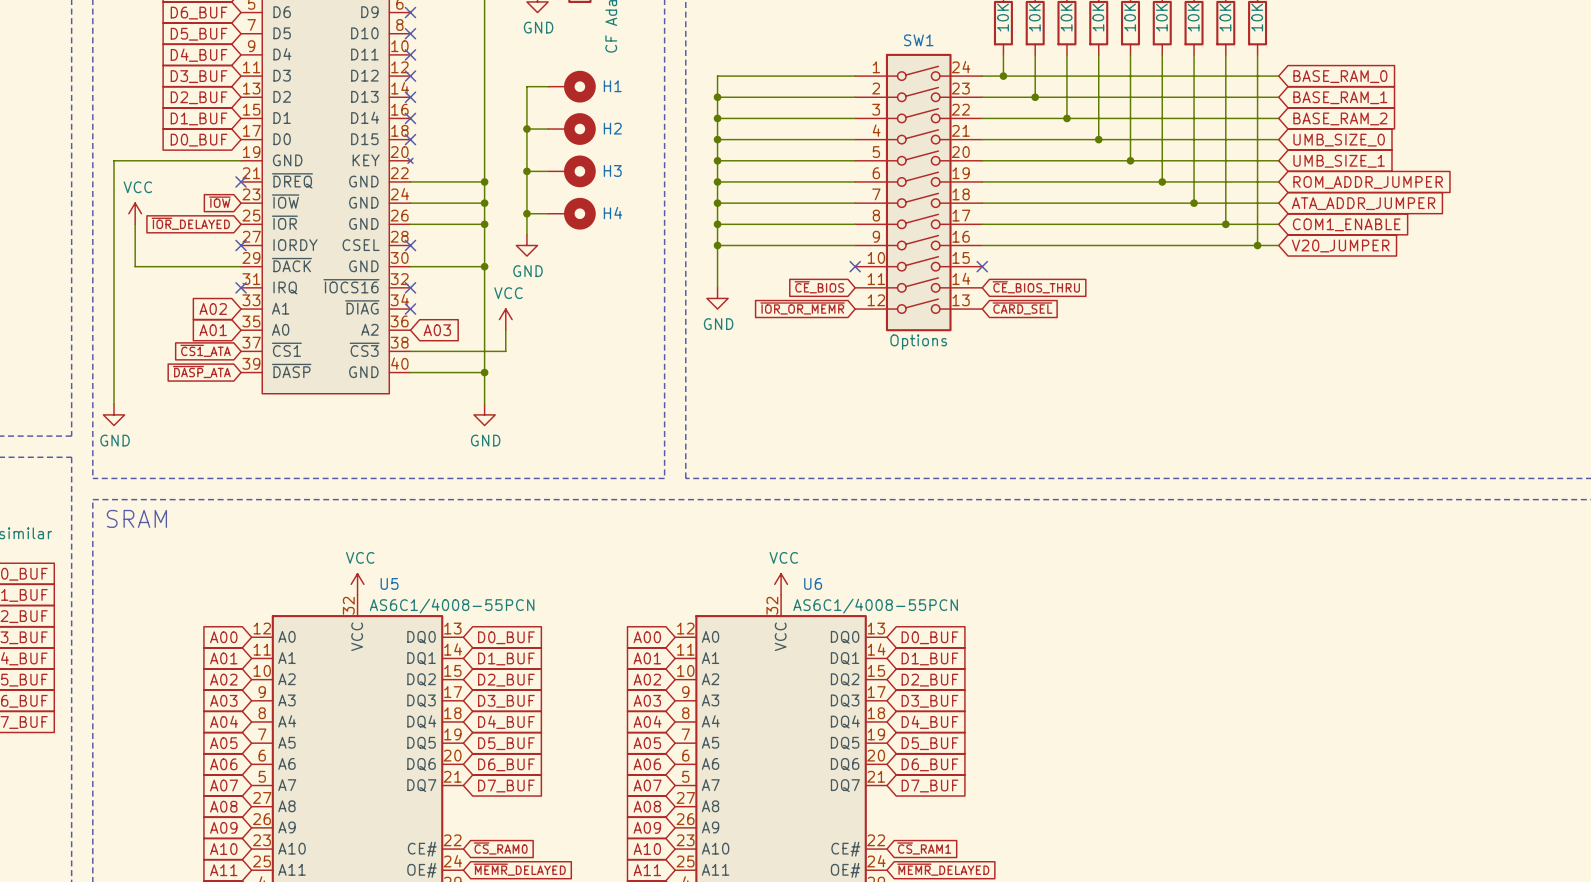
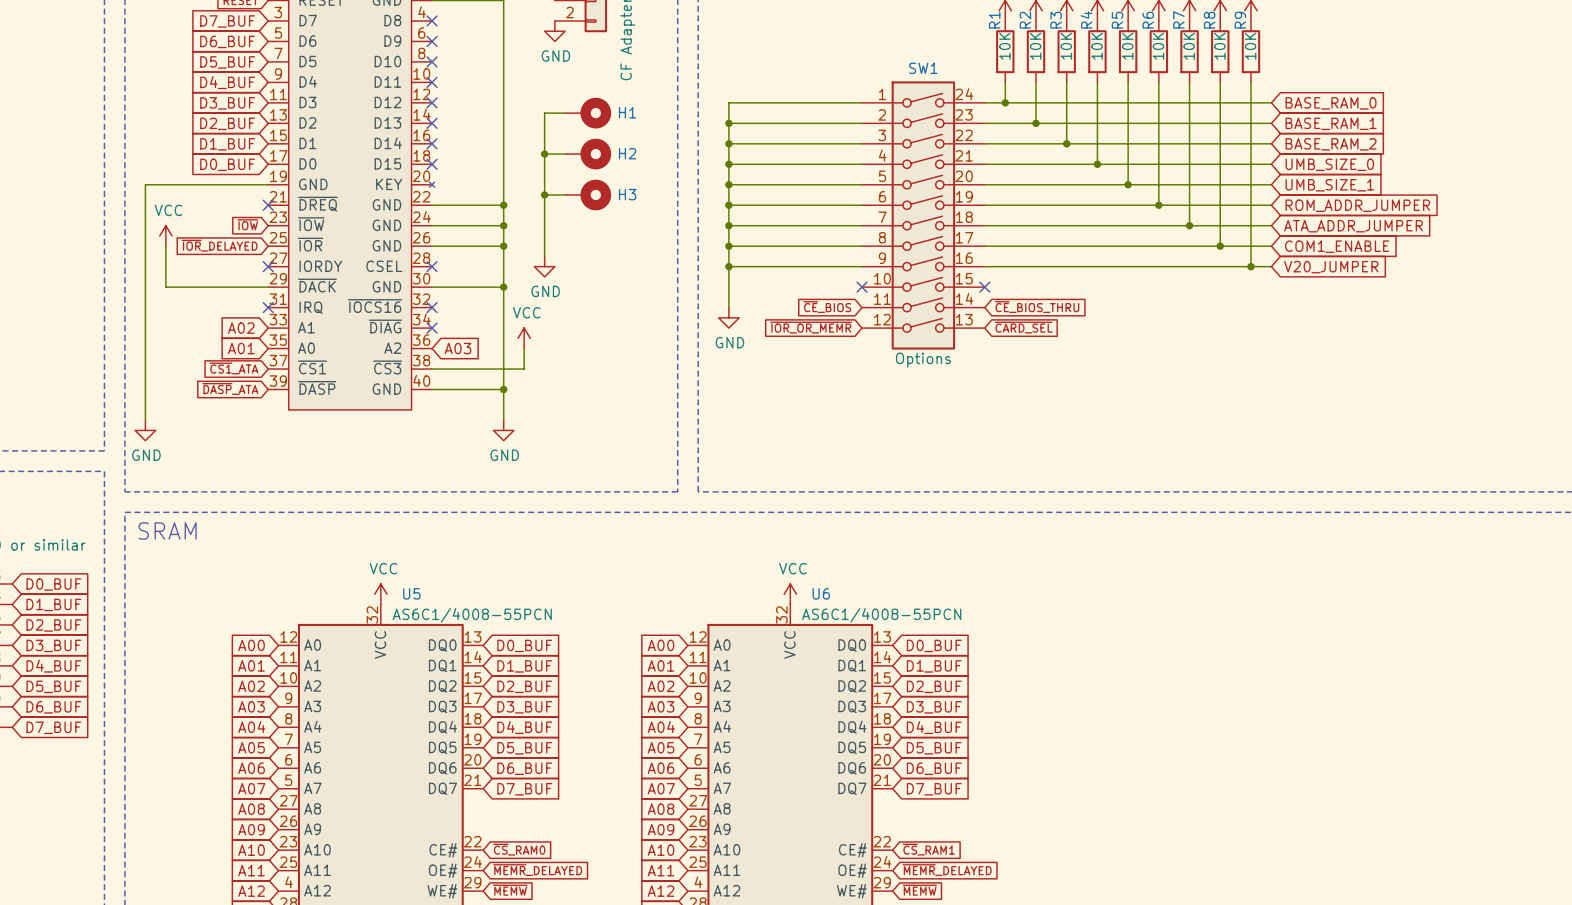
wire: (526, 213) (548, 213) -> none
junction: (526, 213) -> none
H4: (571, 213) -> none

